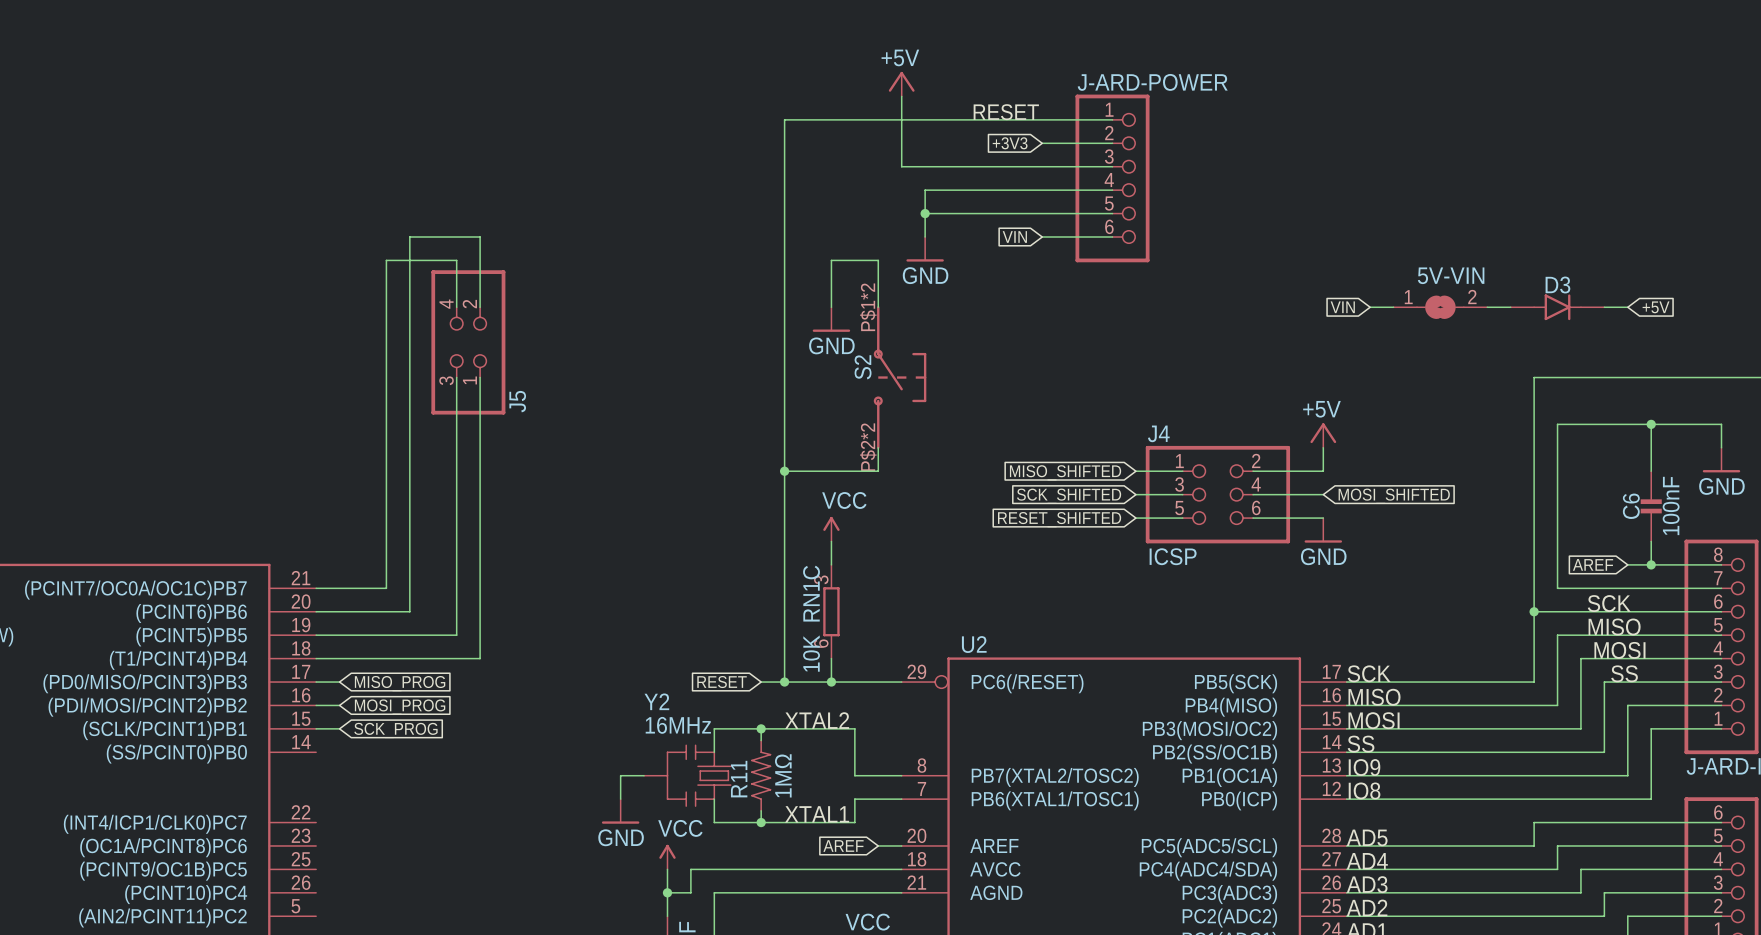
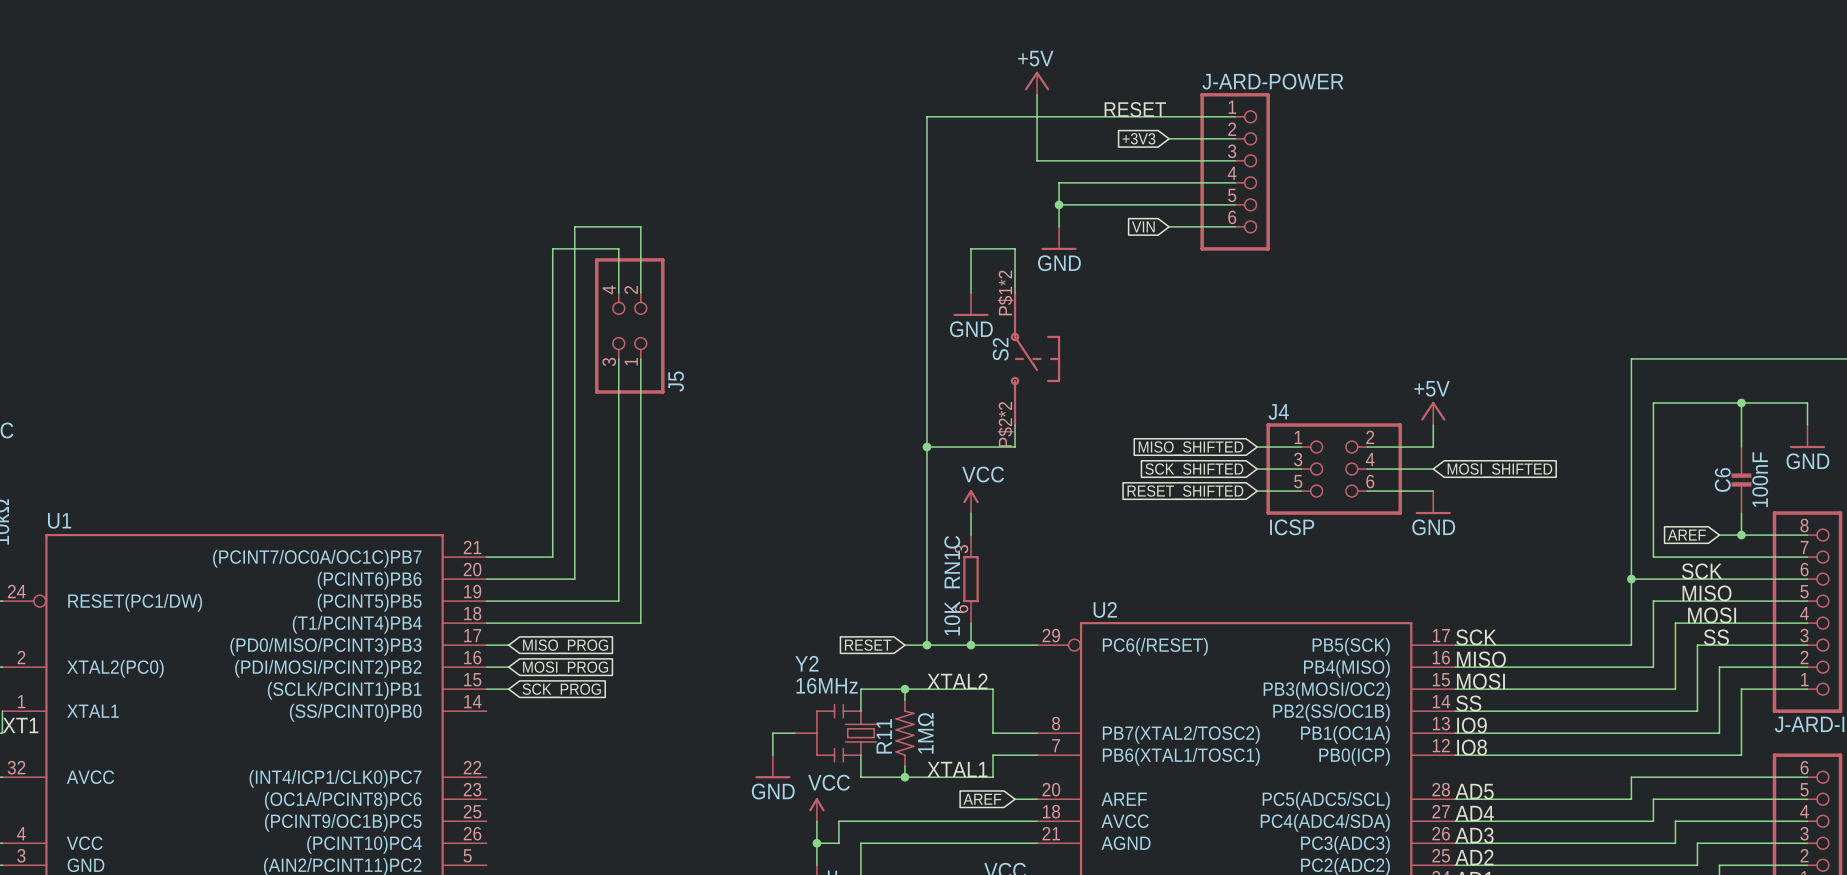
global label: VIN (1342, 307) -> none
wire: (1370, 307) (1393, 307) -> none
5V-VIN: (1440, 307) -> none
wire: (1487, 307) (1510, 307) -> none
D3: (1557, 307) -> none
wire: (1604, 307) (1627, 307) -> none
global label: +5V (1656, 307) -> none

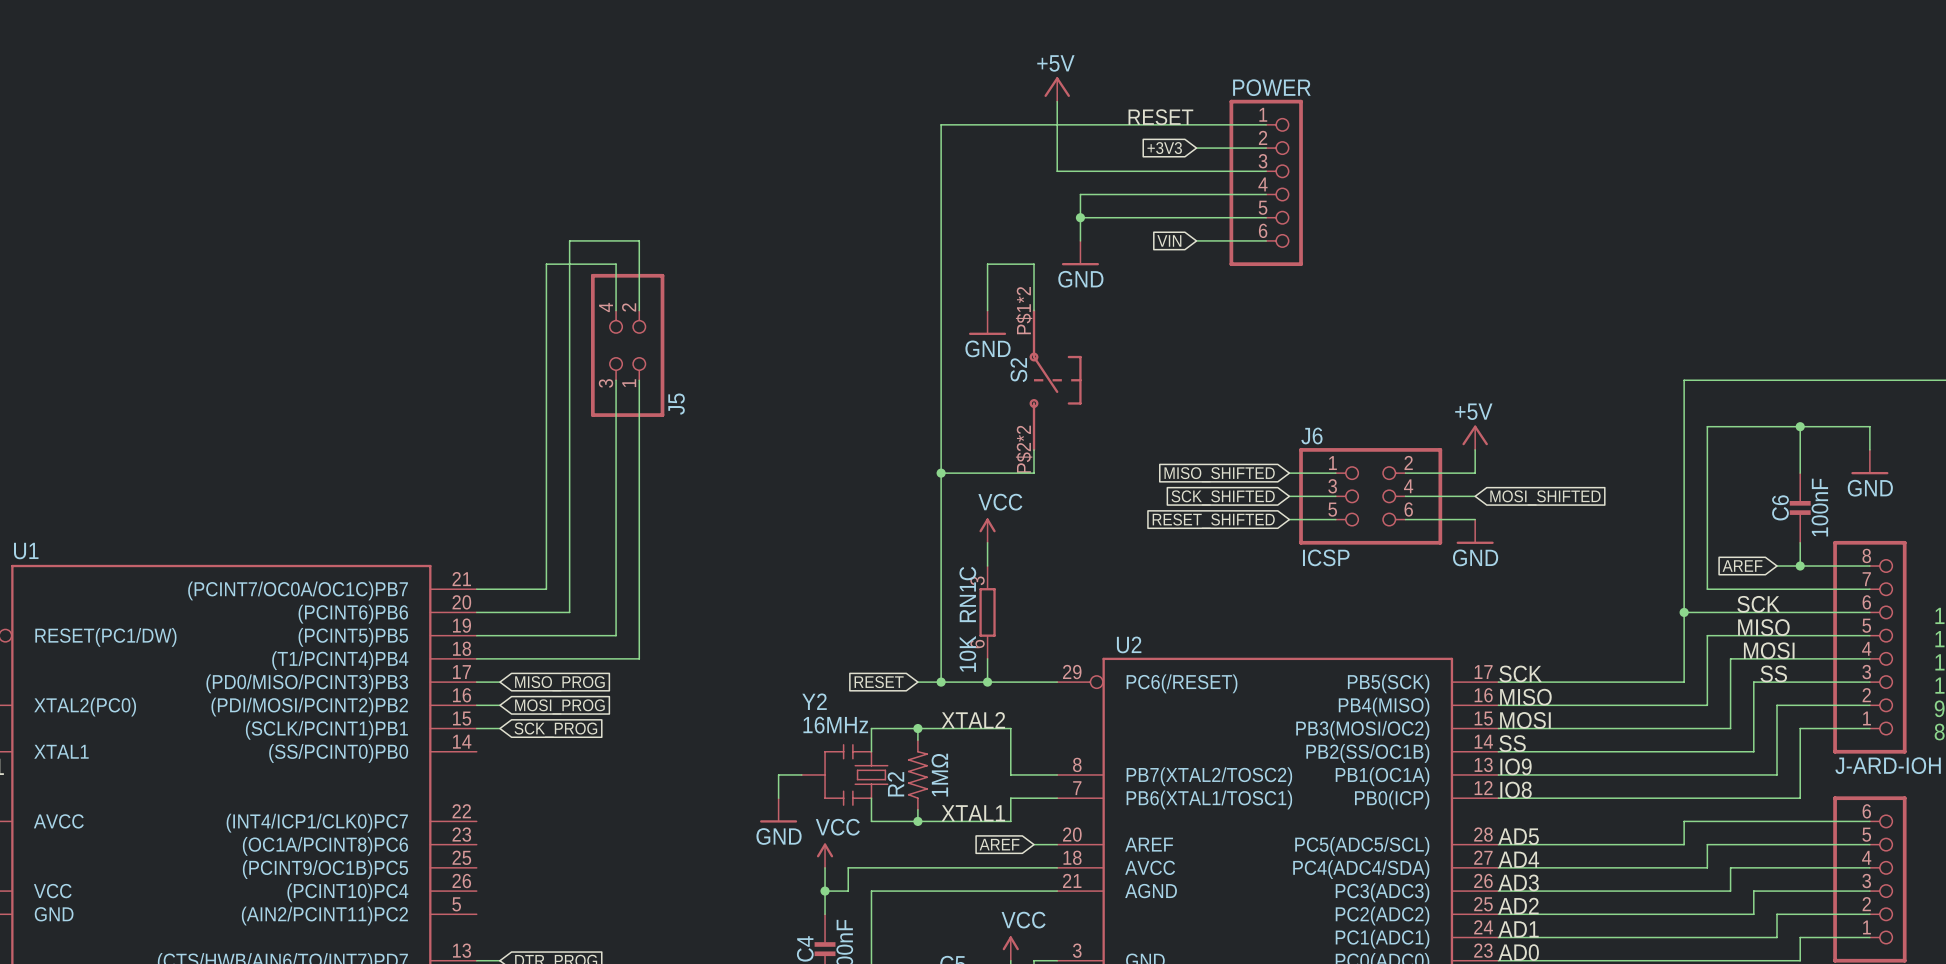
J-ARD-POWER name: J-ARD-POWER (1272, 81) -> POWER (1271, 87)
J4 name: J4 (1278, 411) -> J6 (1311, 435)
R11 name: R11 (884, 736) -> R2 (895, 784)

